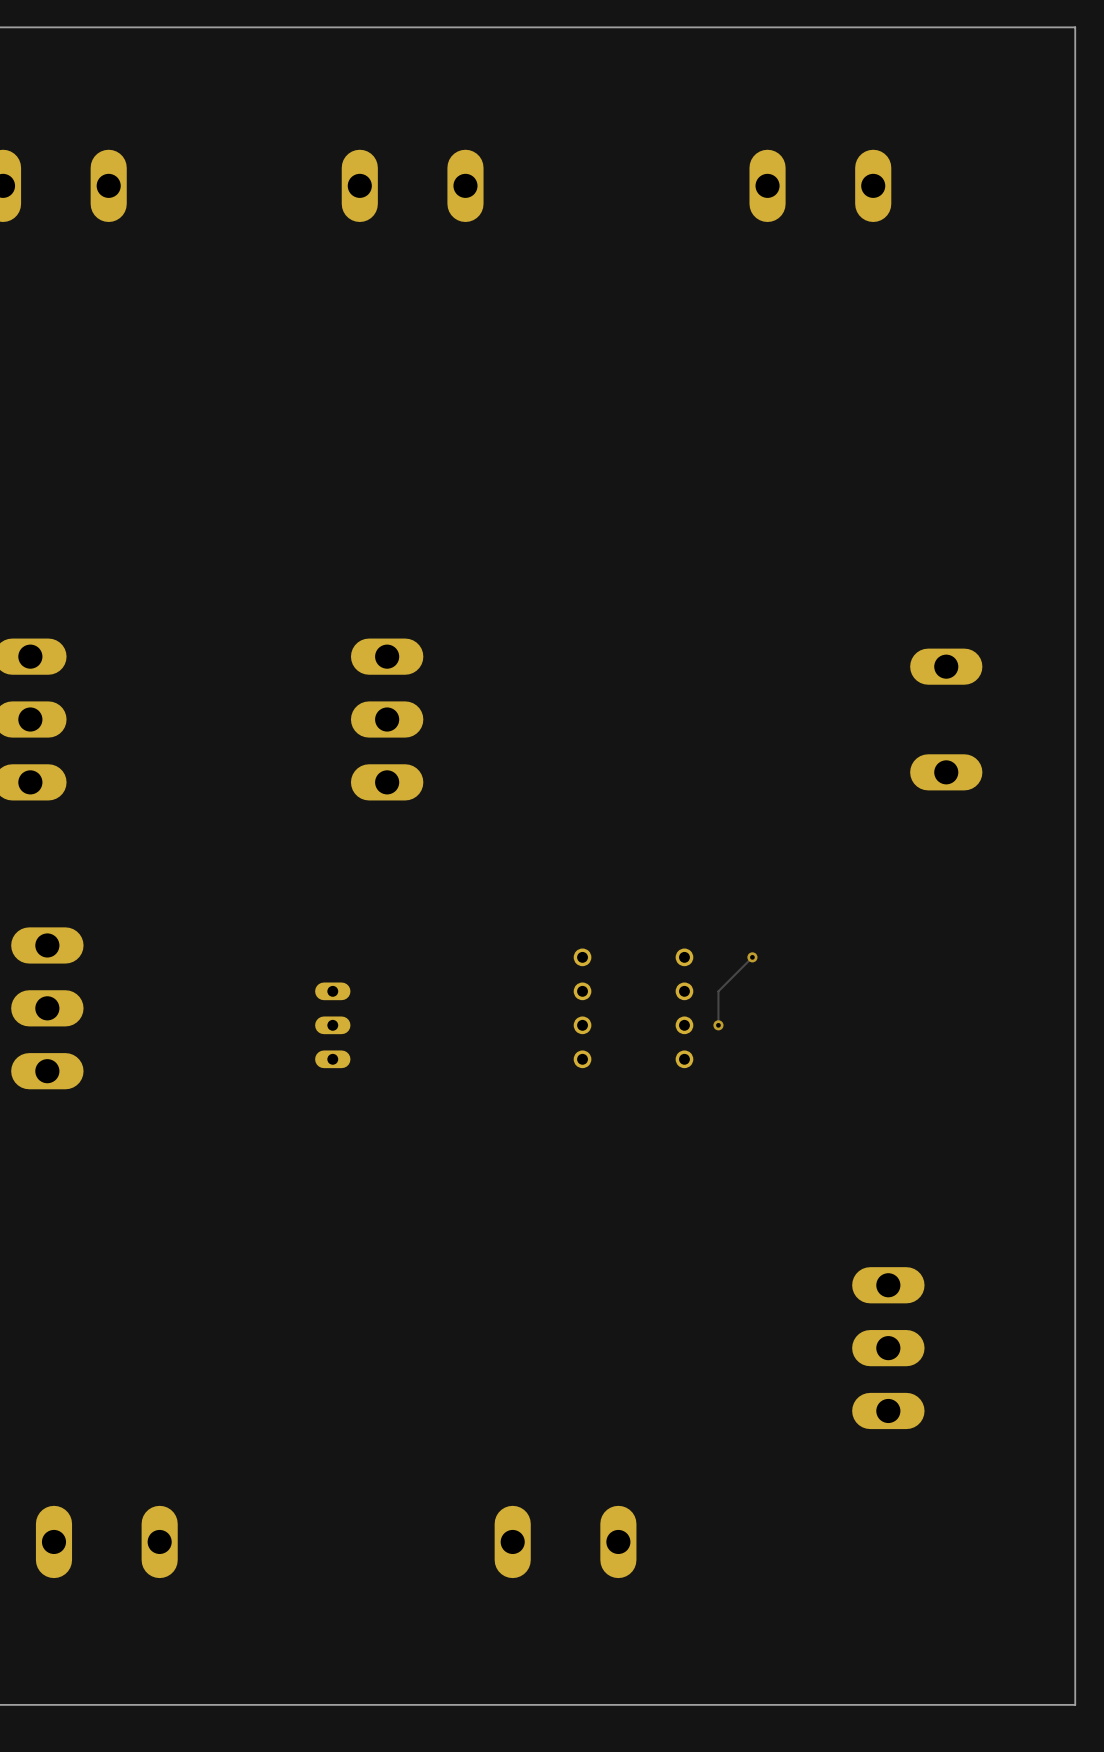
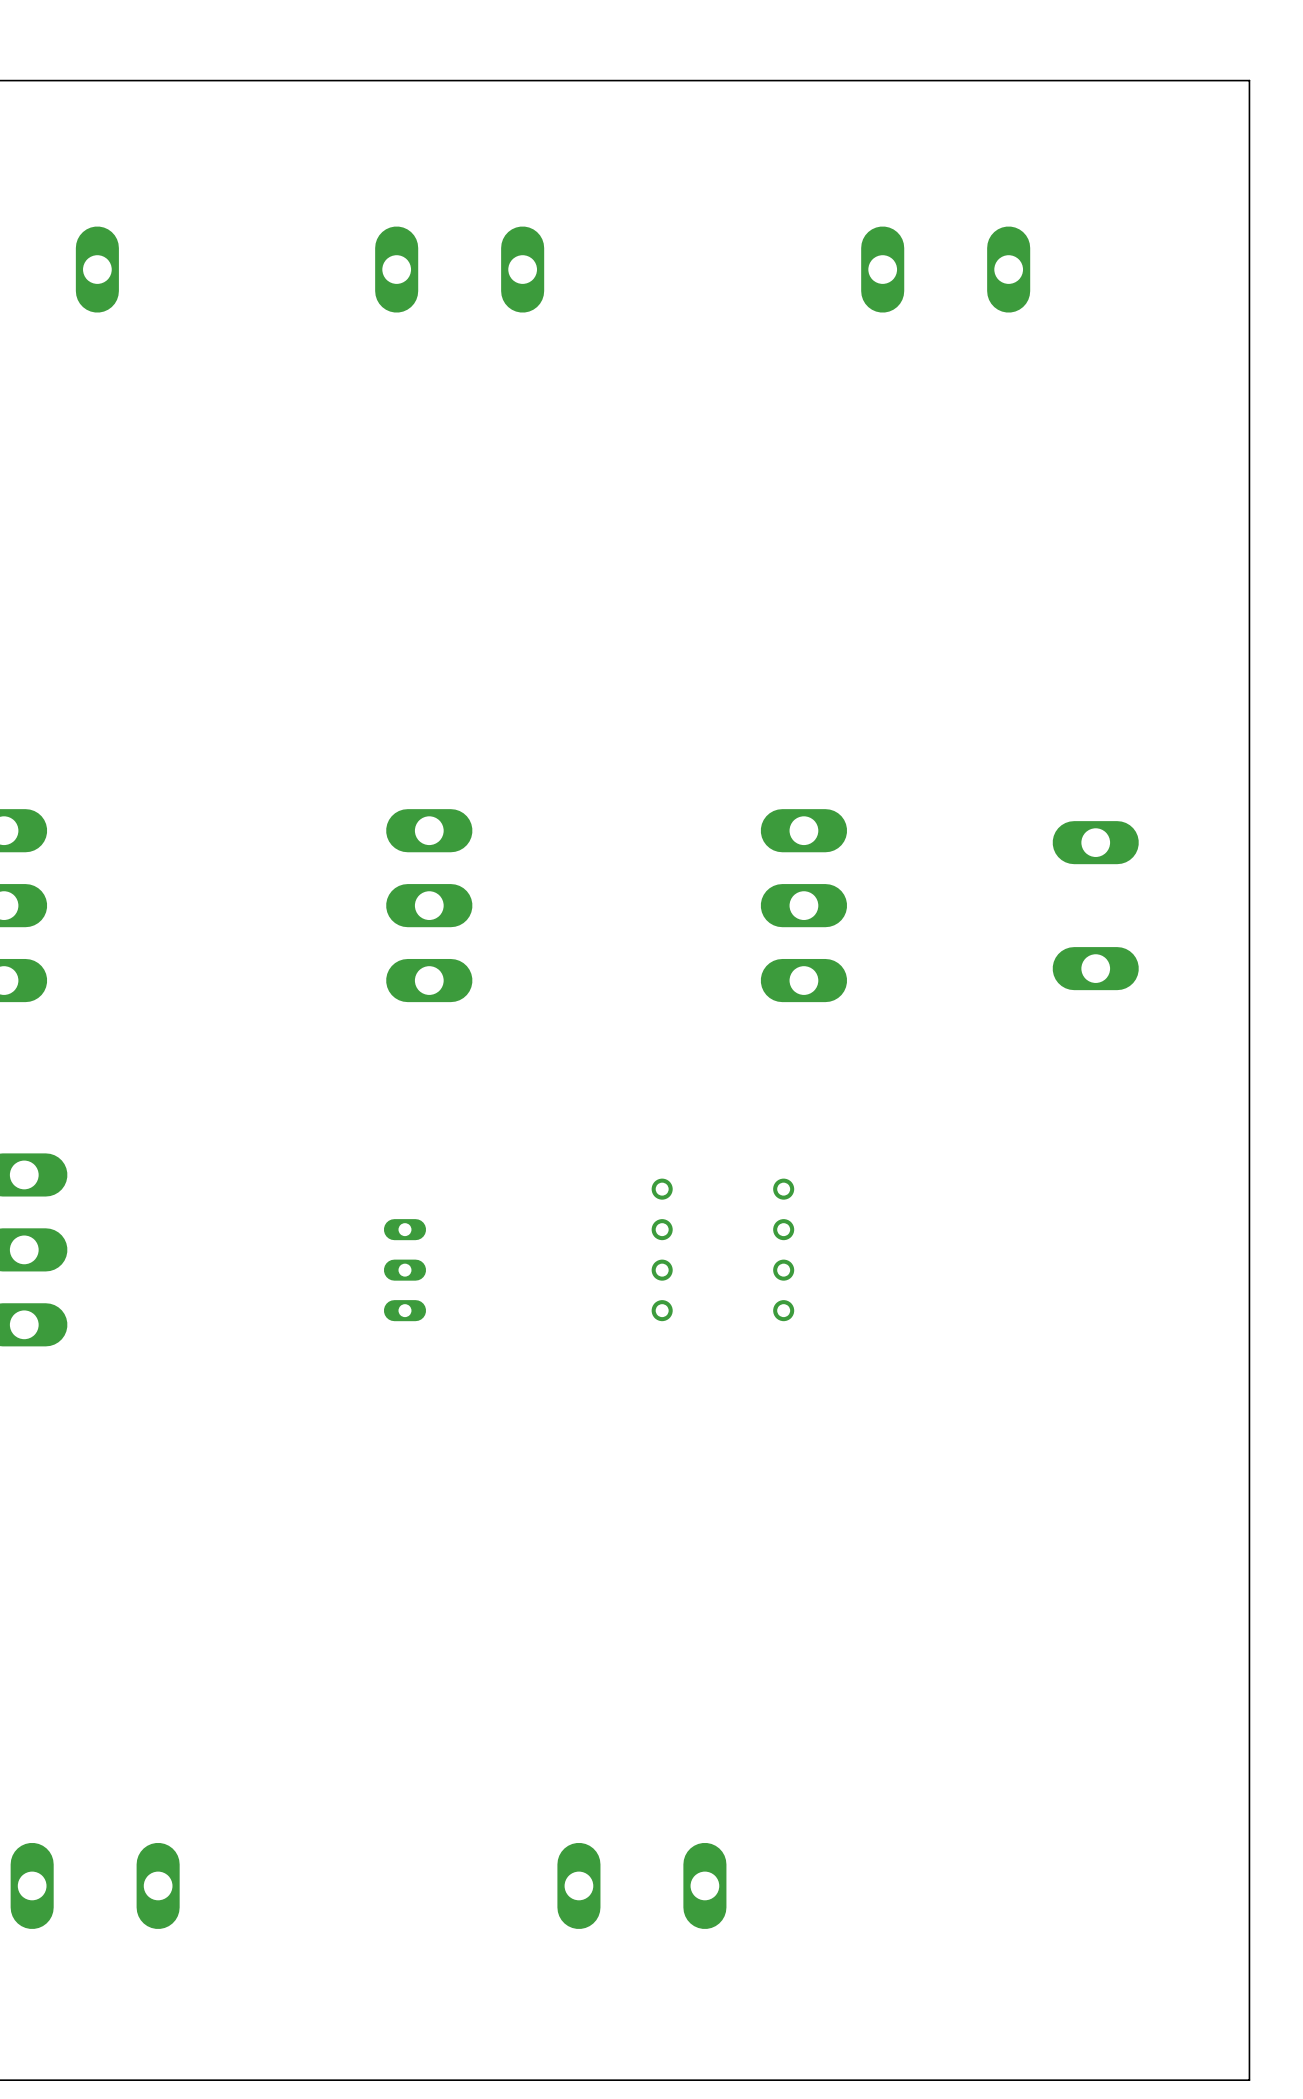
part: none -> (803, 905)
track: (752, 957) (718, 991) (718, 1025) -> none
via: (752, 957) -> none
part position: (332, 1025) -> (404, 1270)
via: (718, 1025) -> none
part: (888, 1348) -> none

